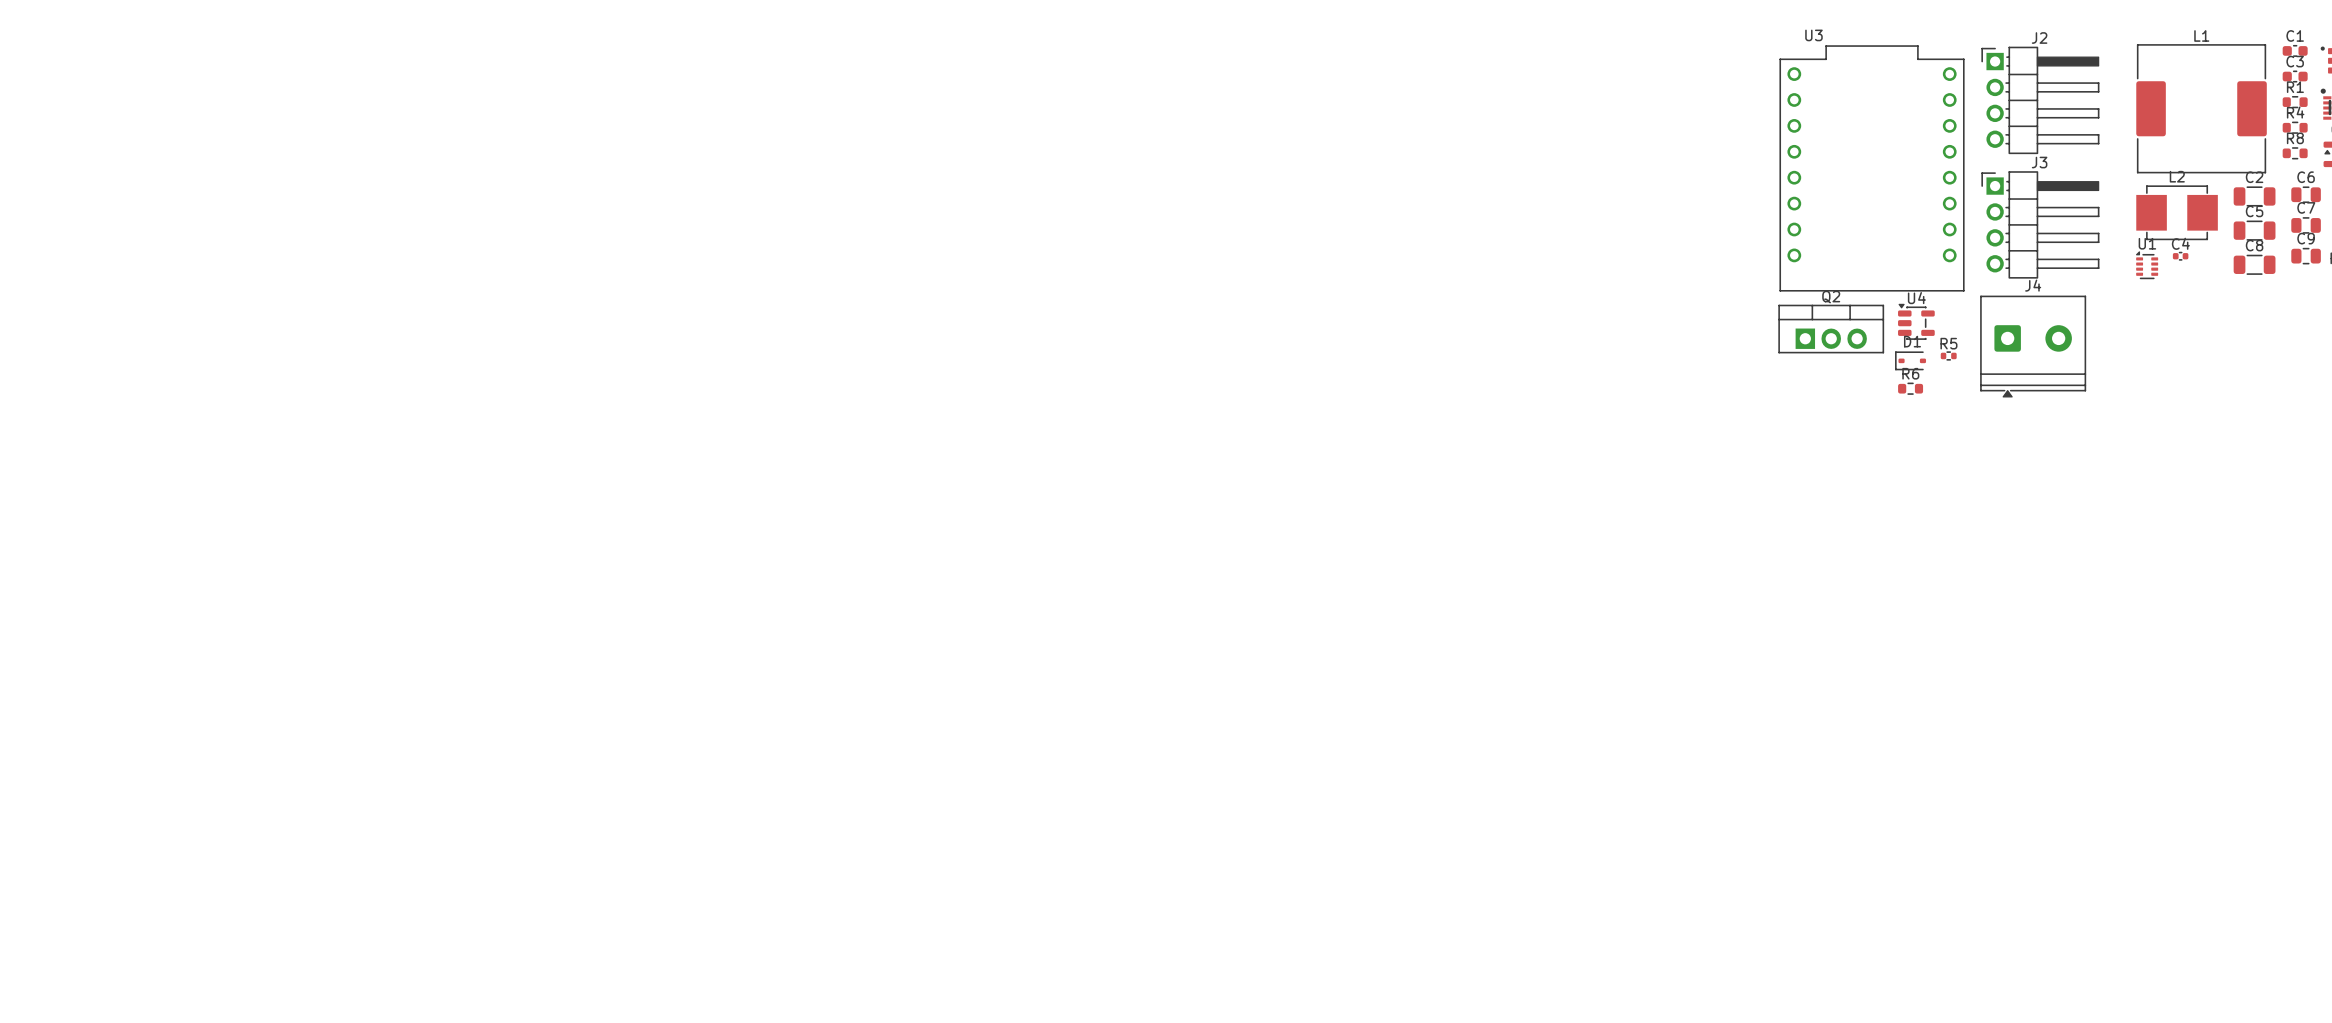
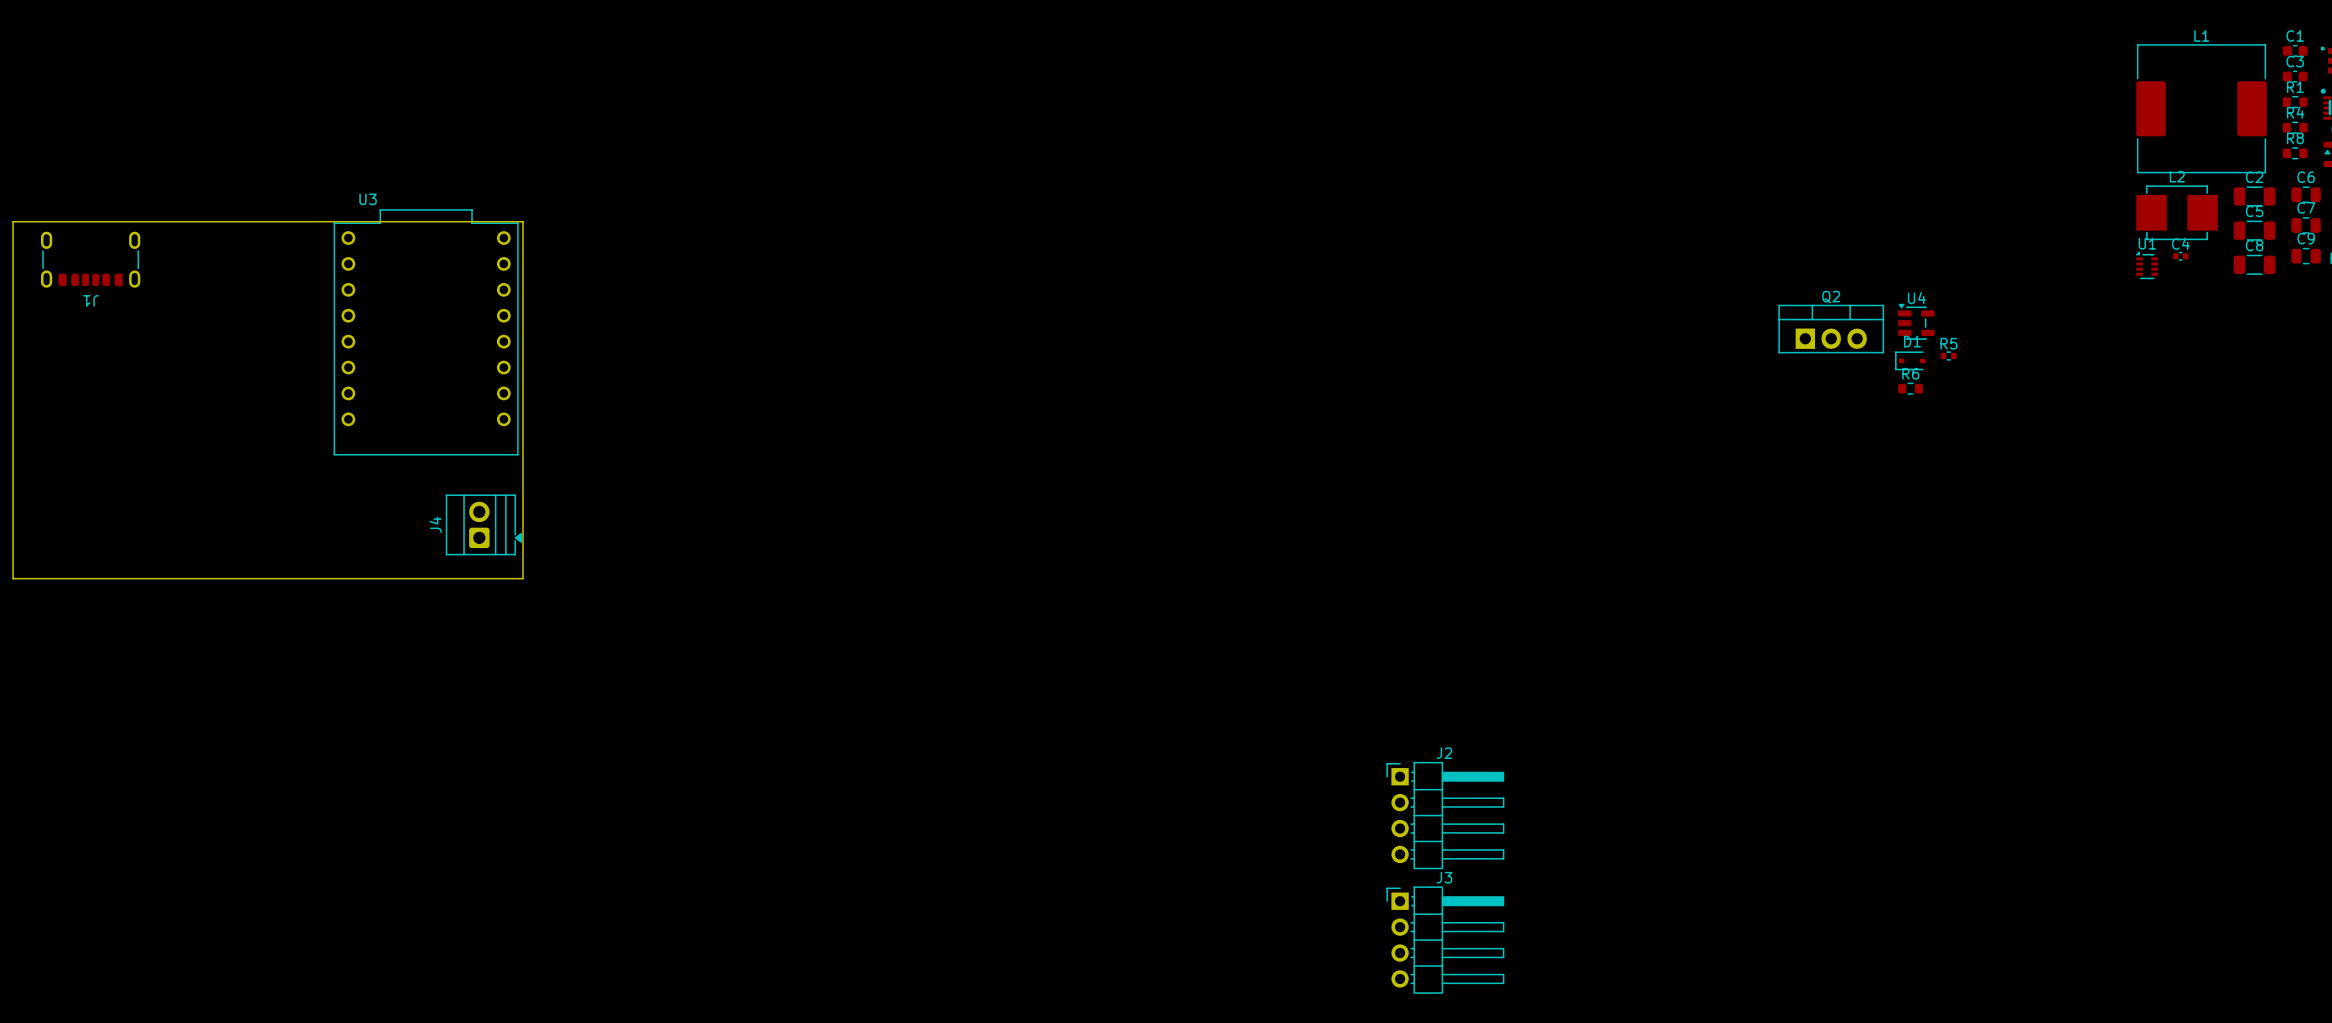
J2 position: (2040, 100) -> (1445, 815)
U3 position: (1872, 168) -> (426, 332)
board edge: none -> (13, 221) (523, 221) (523, 578) (13, 578) (13, 221)
J3 position: (2040, 224) -> (1445, 940)
J1: none -> (90, 259)
J4 name position: J4 (2033, 285) -> J4 (435, 524)
J4 footprint: [1980, 295, 2086, 398] -> [445, 494, 523, 556]

